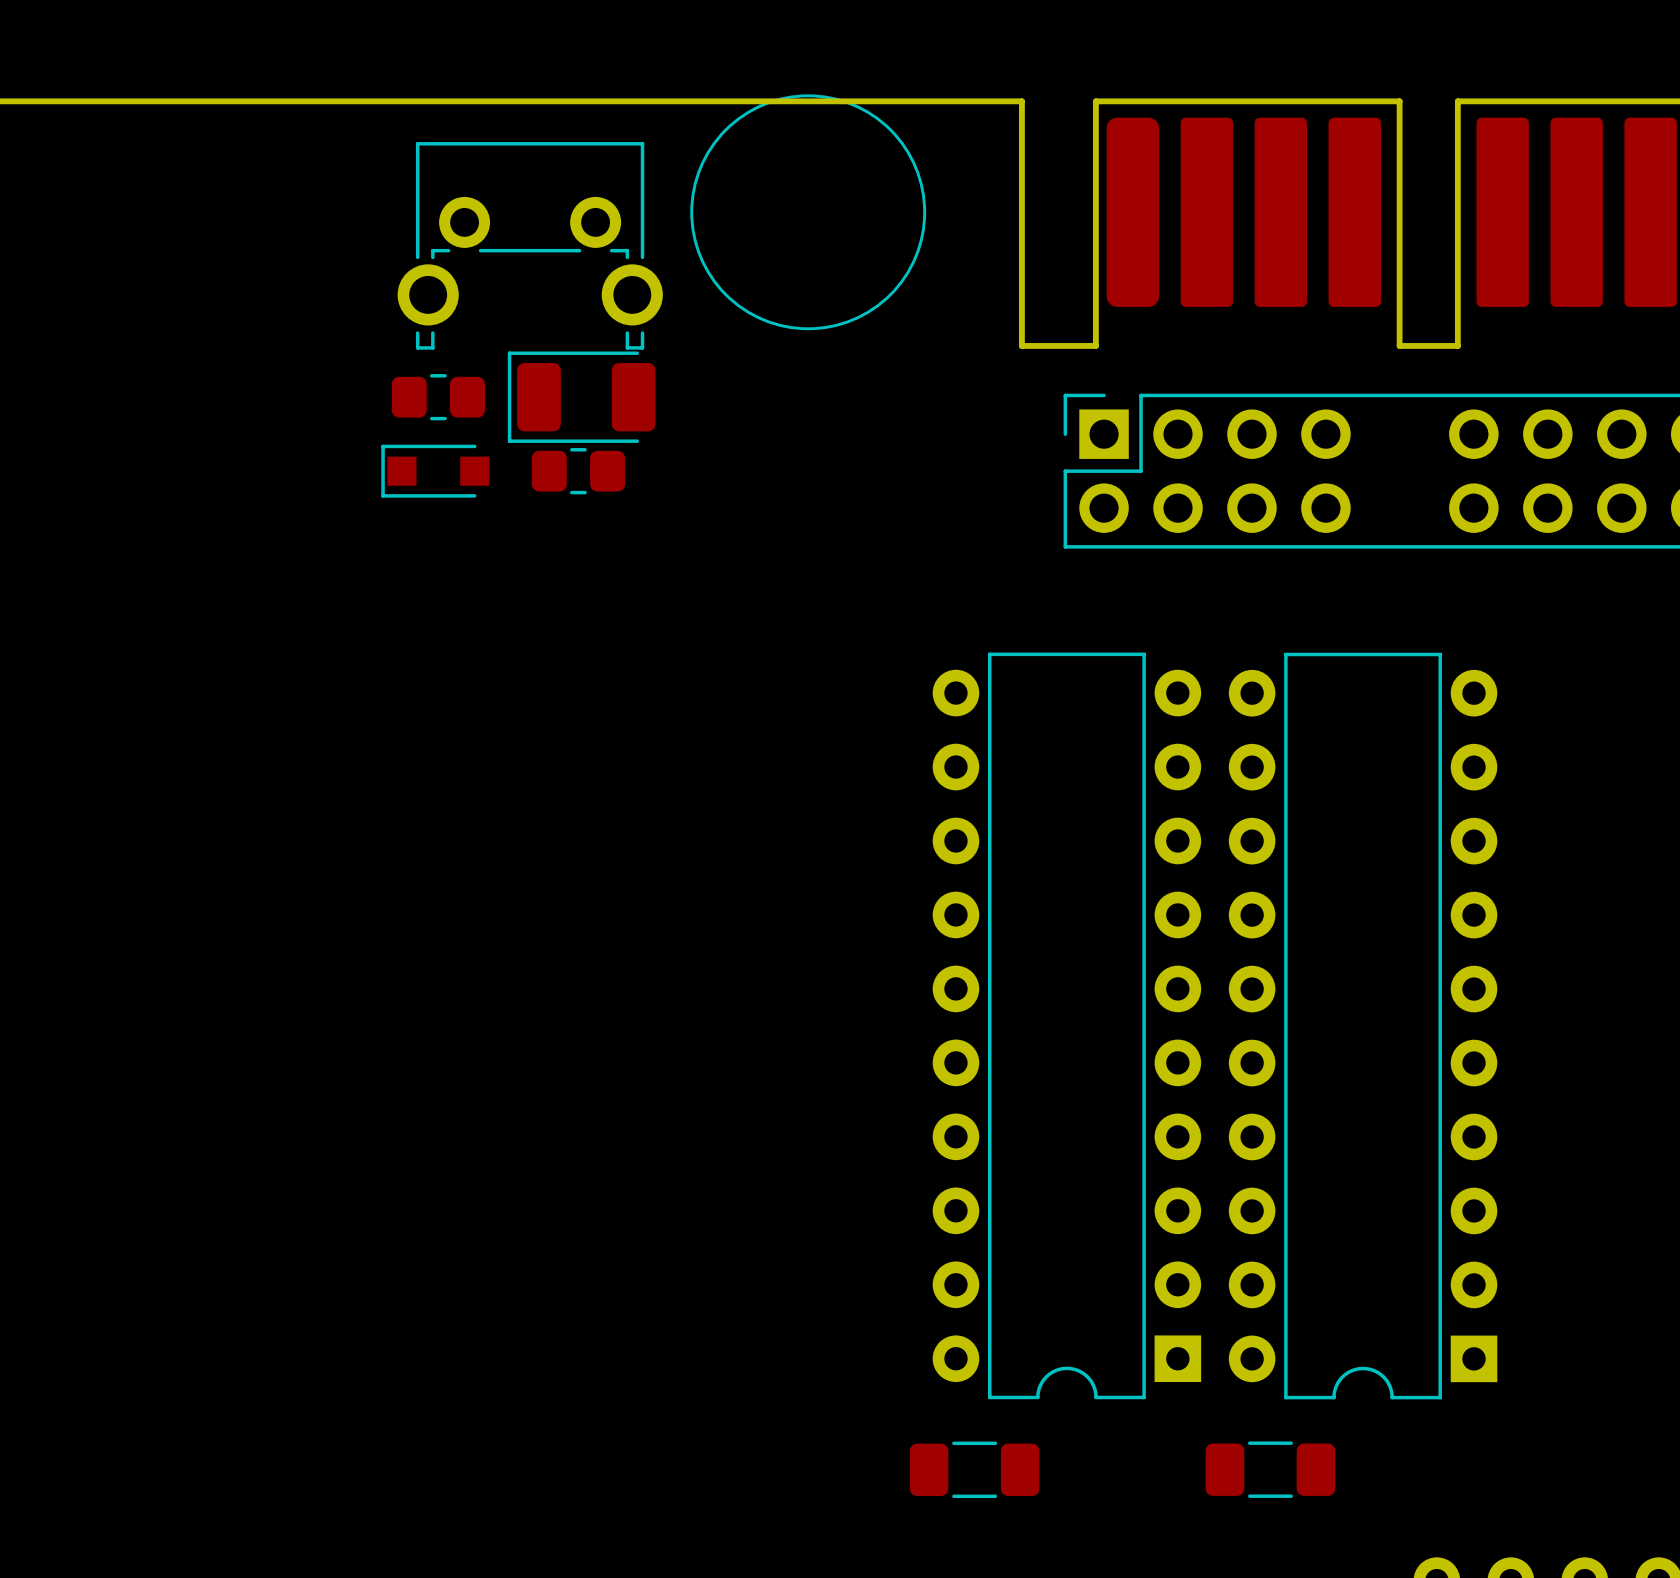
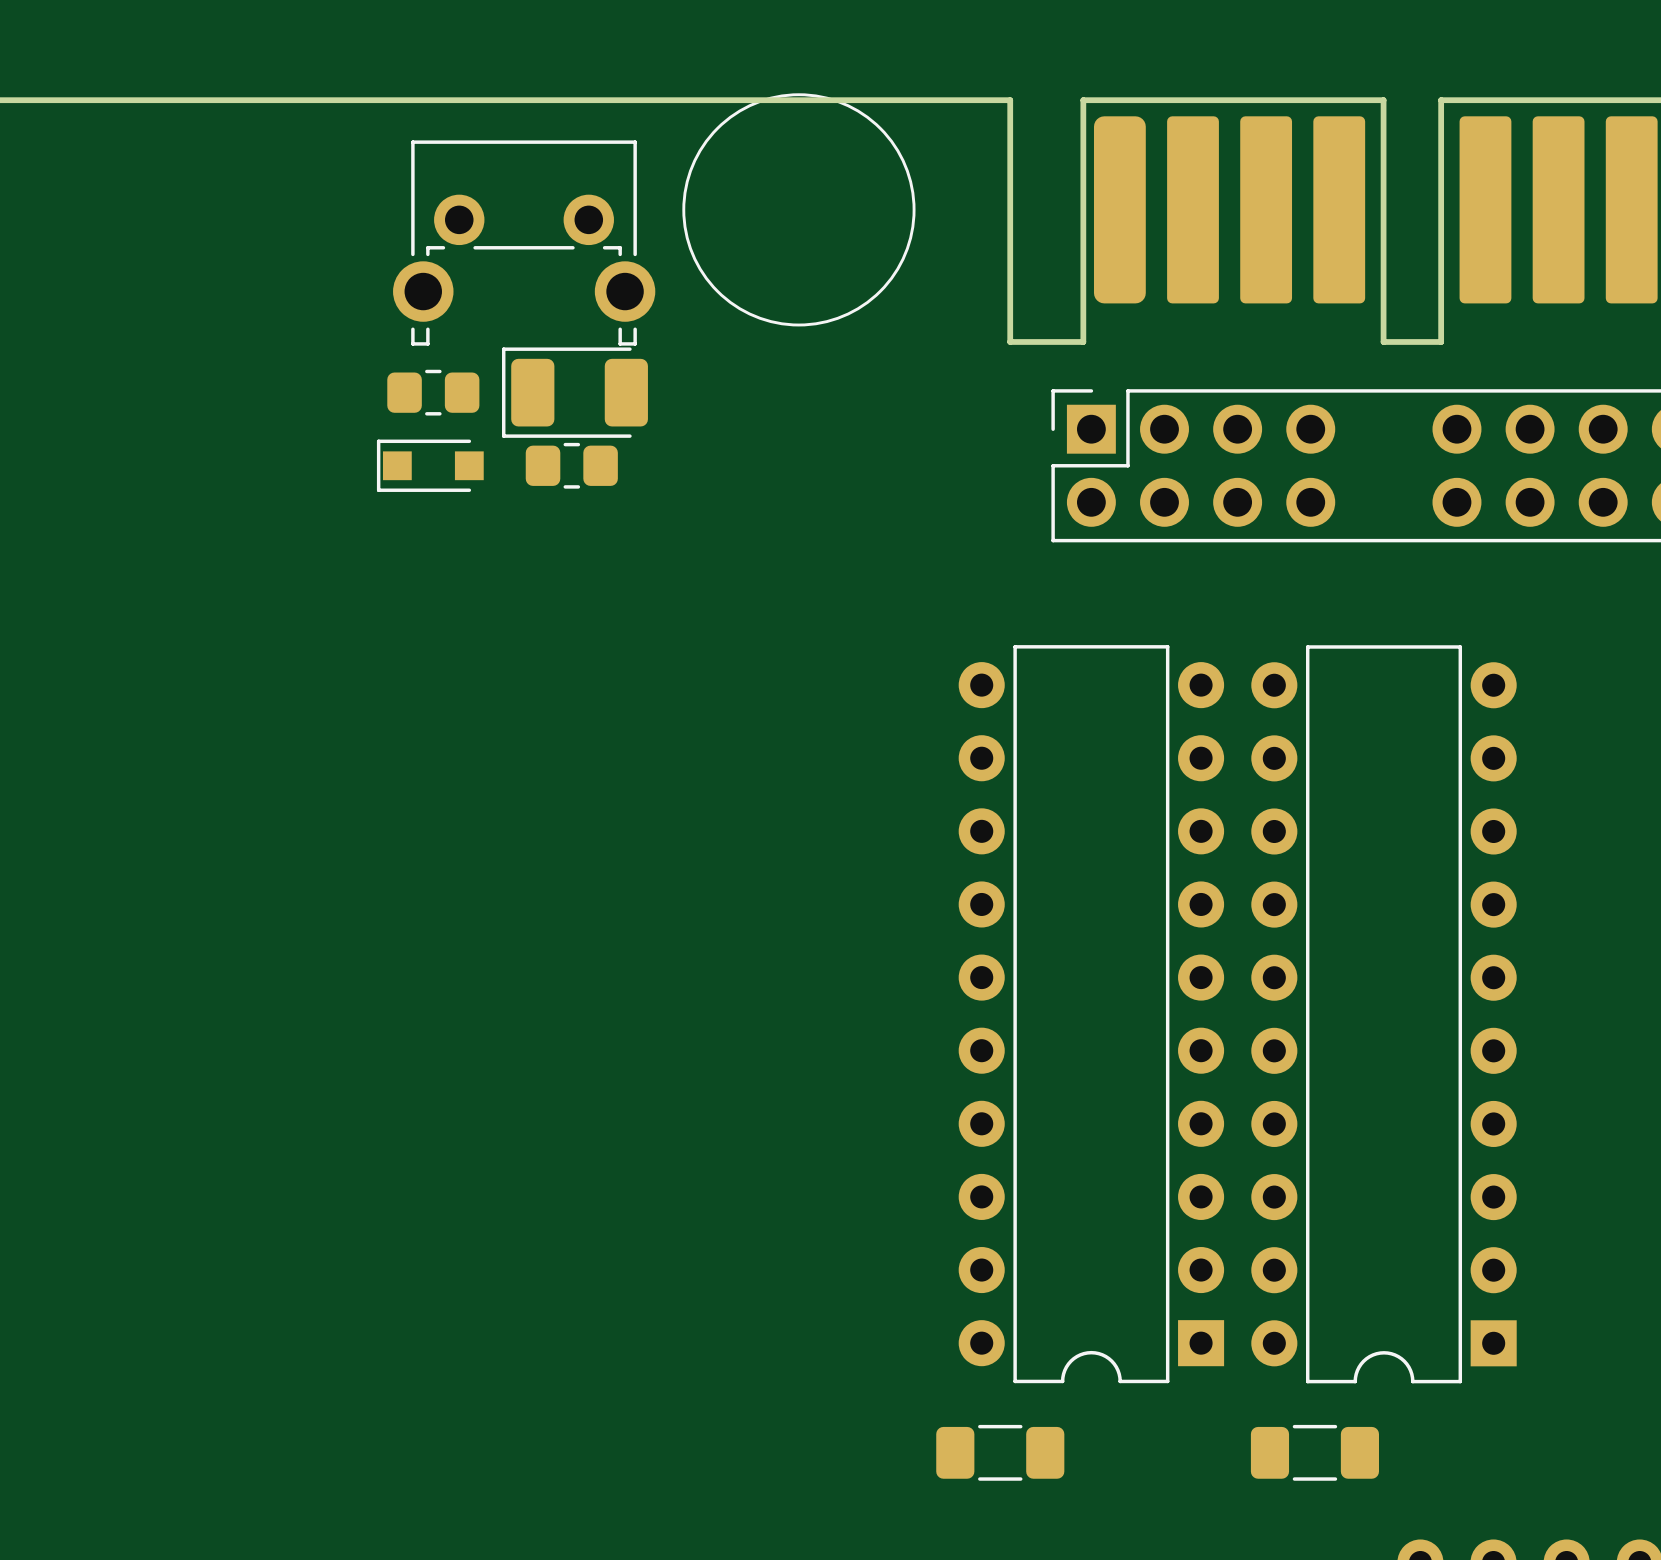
part position: (1066, 1025) -> (1091, 1014)
part position: (1363, 1026) -> (1384, 1014)
part position: (974, 1469) -> (1000, 1452)
part position: (1270, 1469) -> (1314, 1452)

